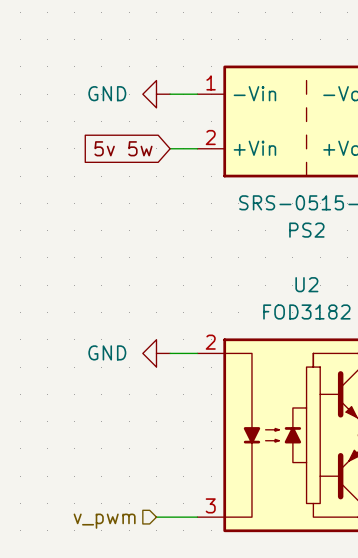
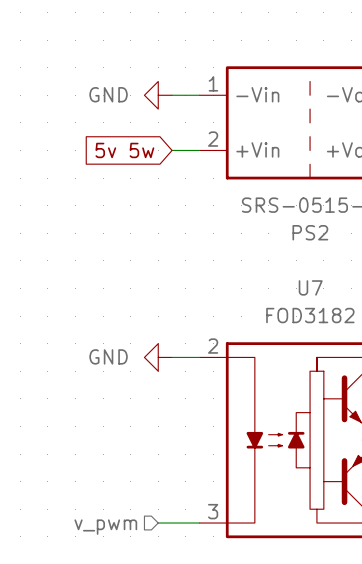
U2 name: U2 (306, 284) -> U7 (310, 287)

